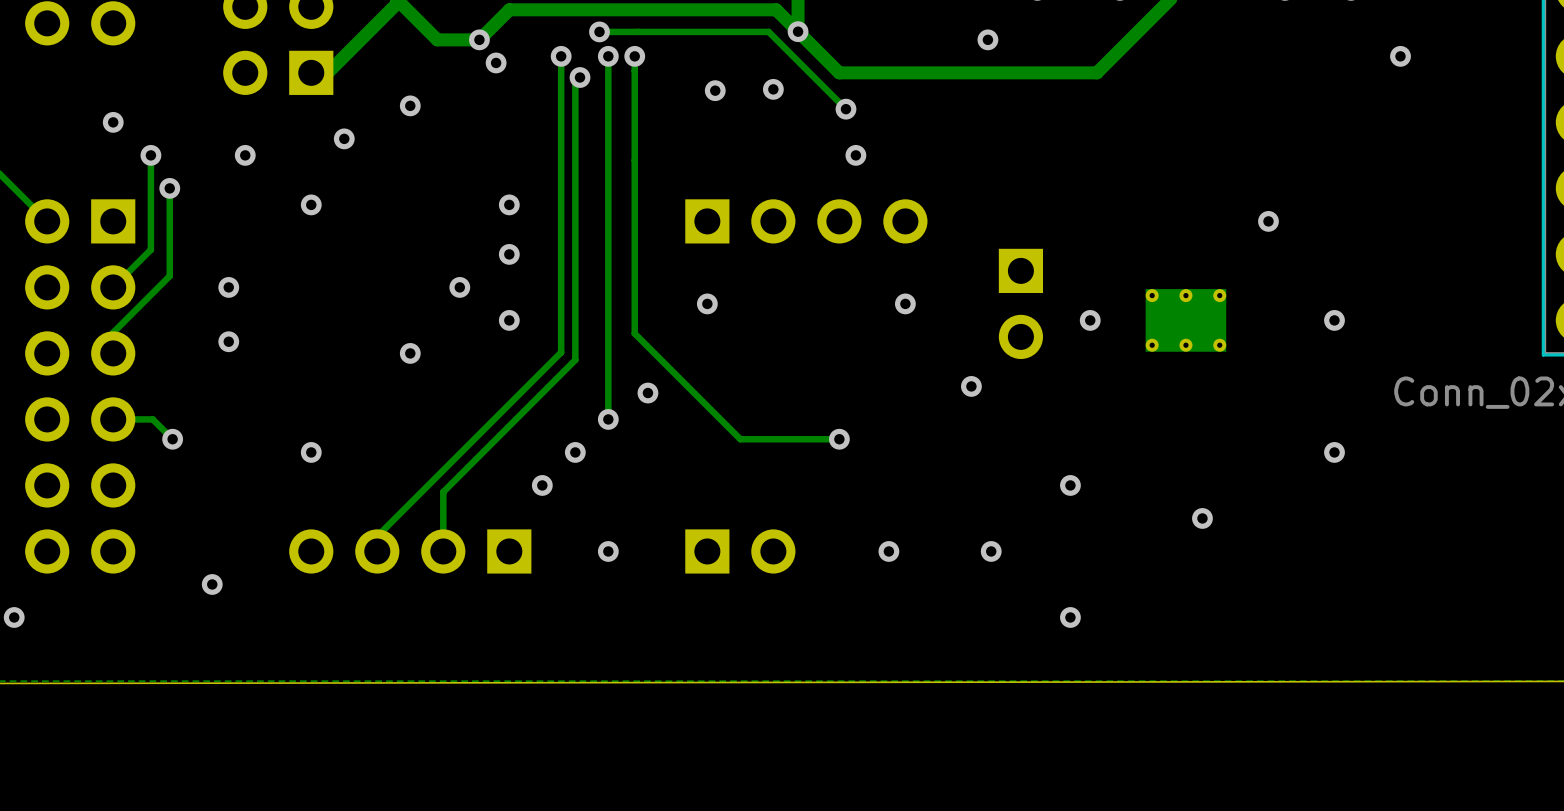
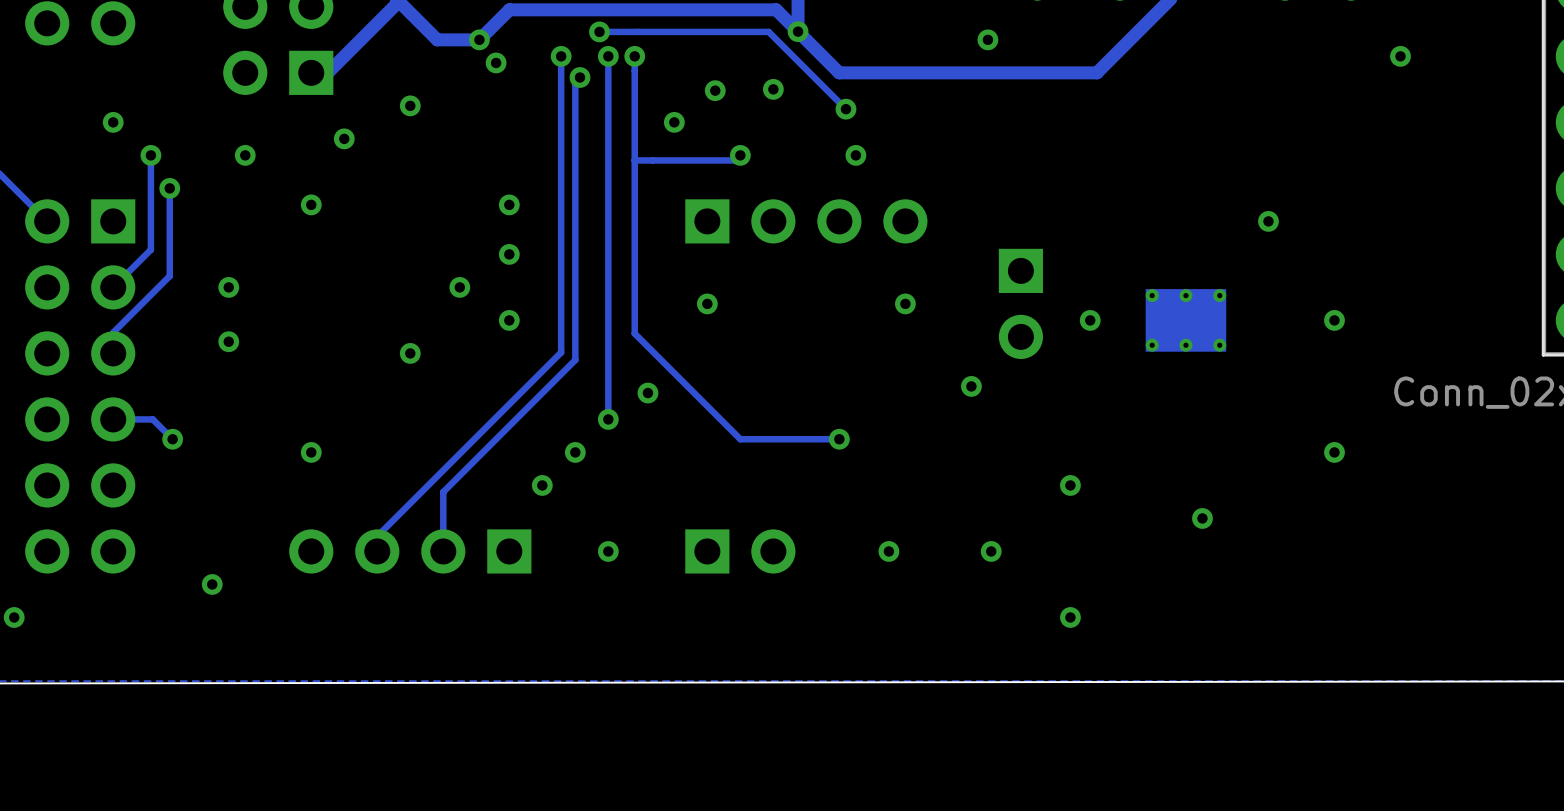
via: none -> (674, 122)
track: none -> (740, 155) (735, 160) (634, 160)
via: none -> (740, 155)

